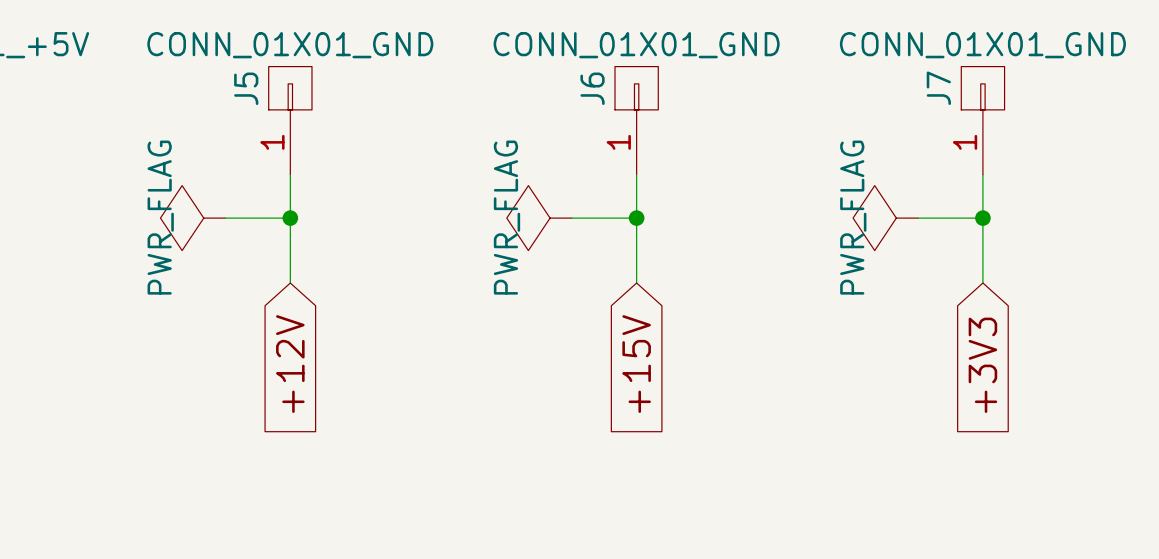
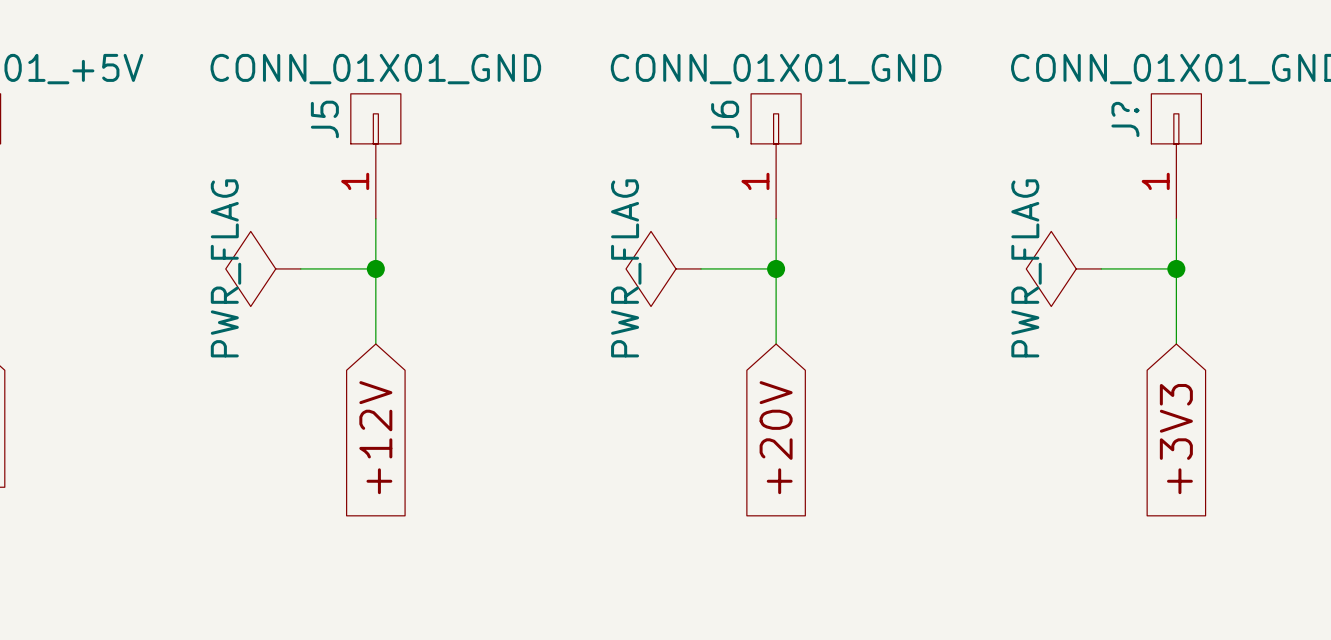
J7 name: J7 (938, 88) -> J? (1125, 119)
global label: +15V (636, 364) -> +20V (776, 437)

